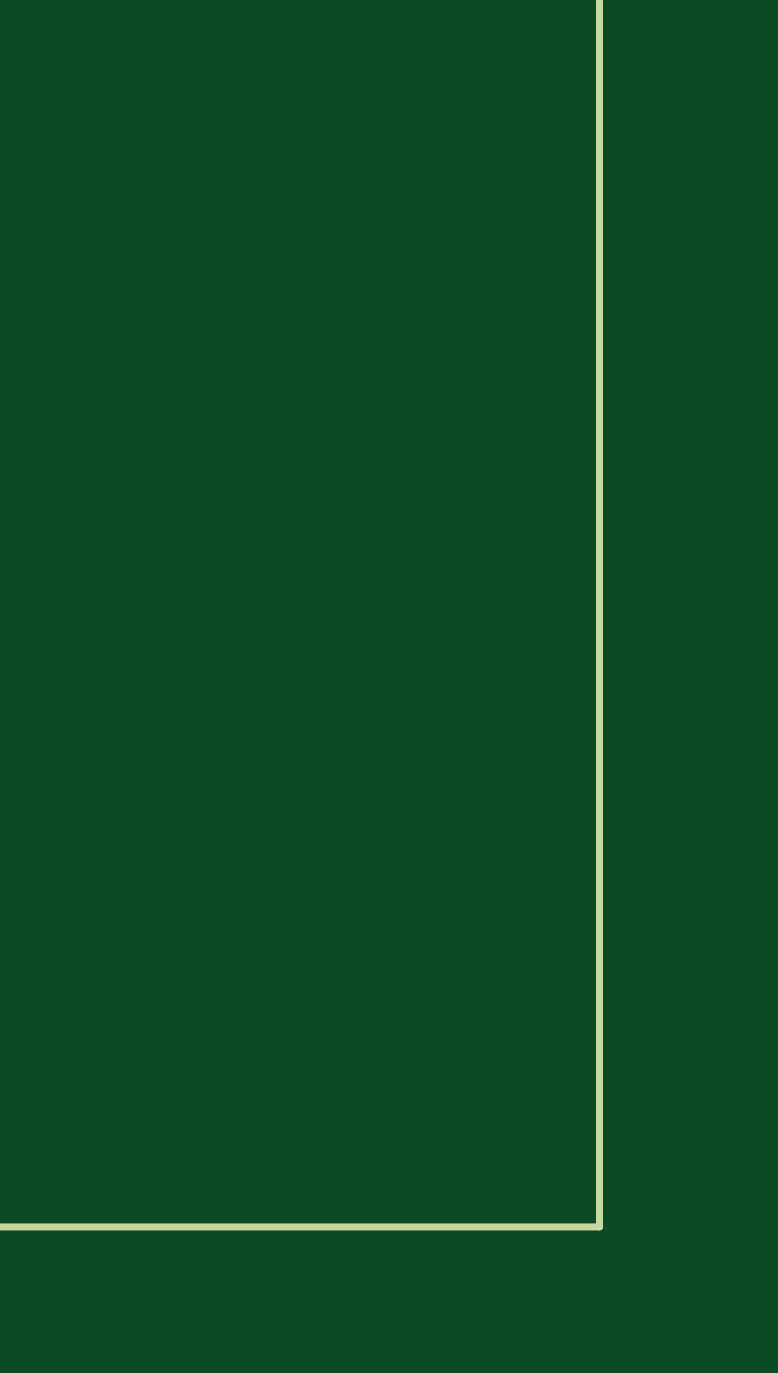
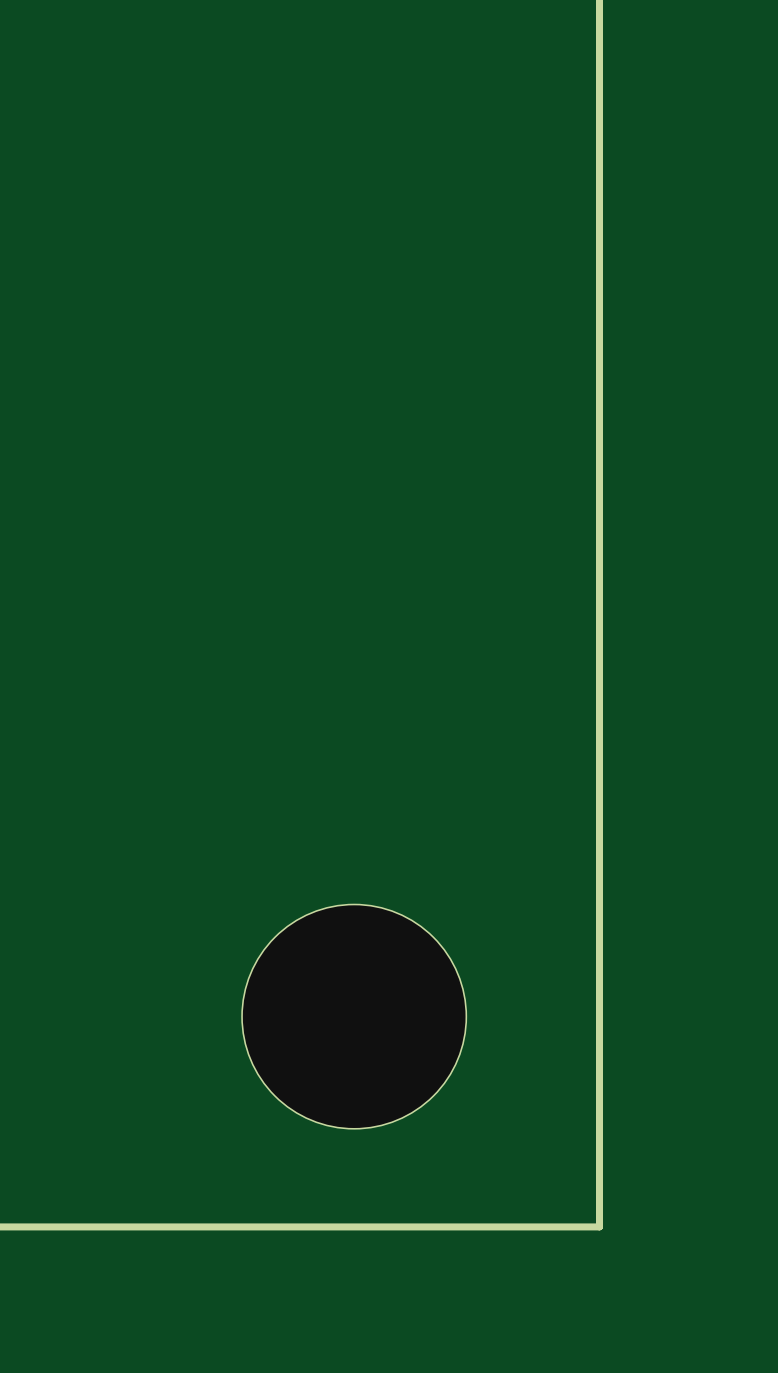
part: none -> (354, 1016)

